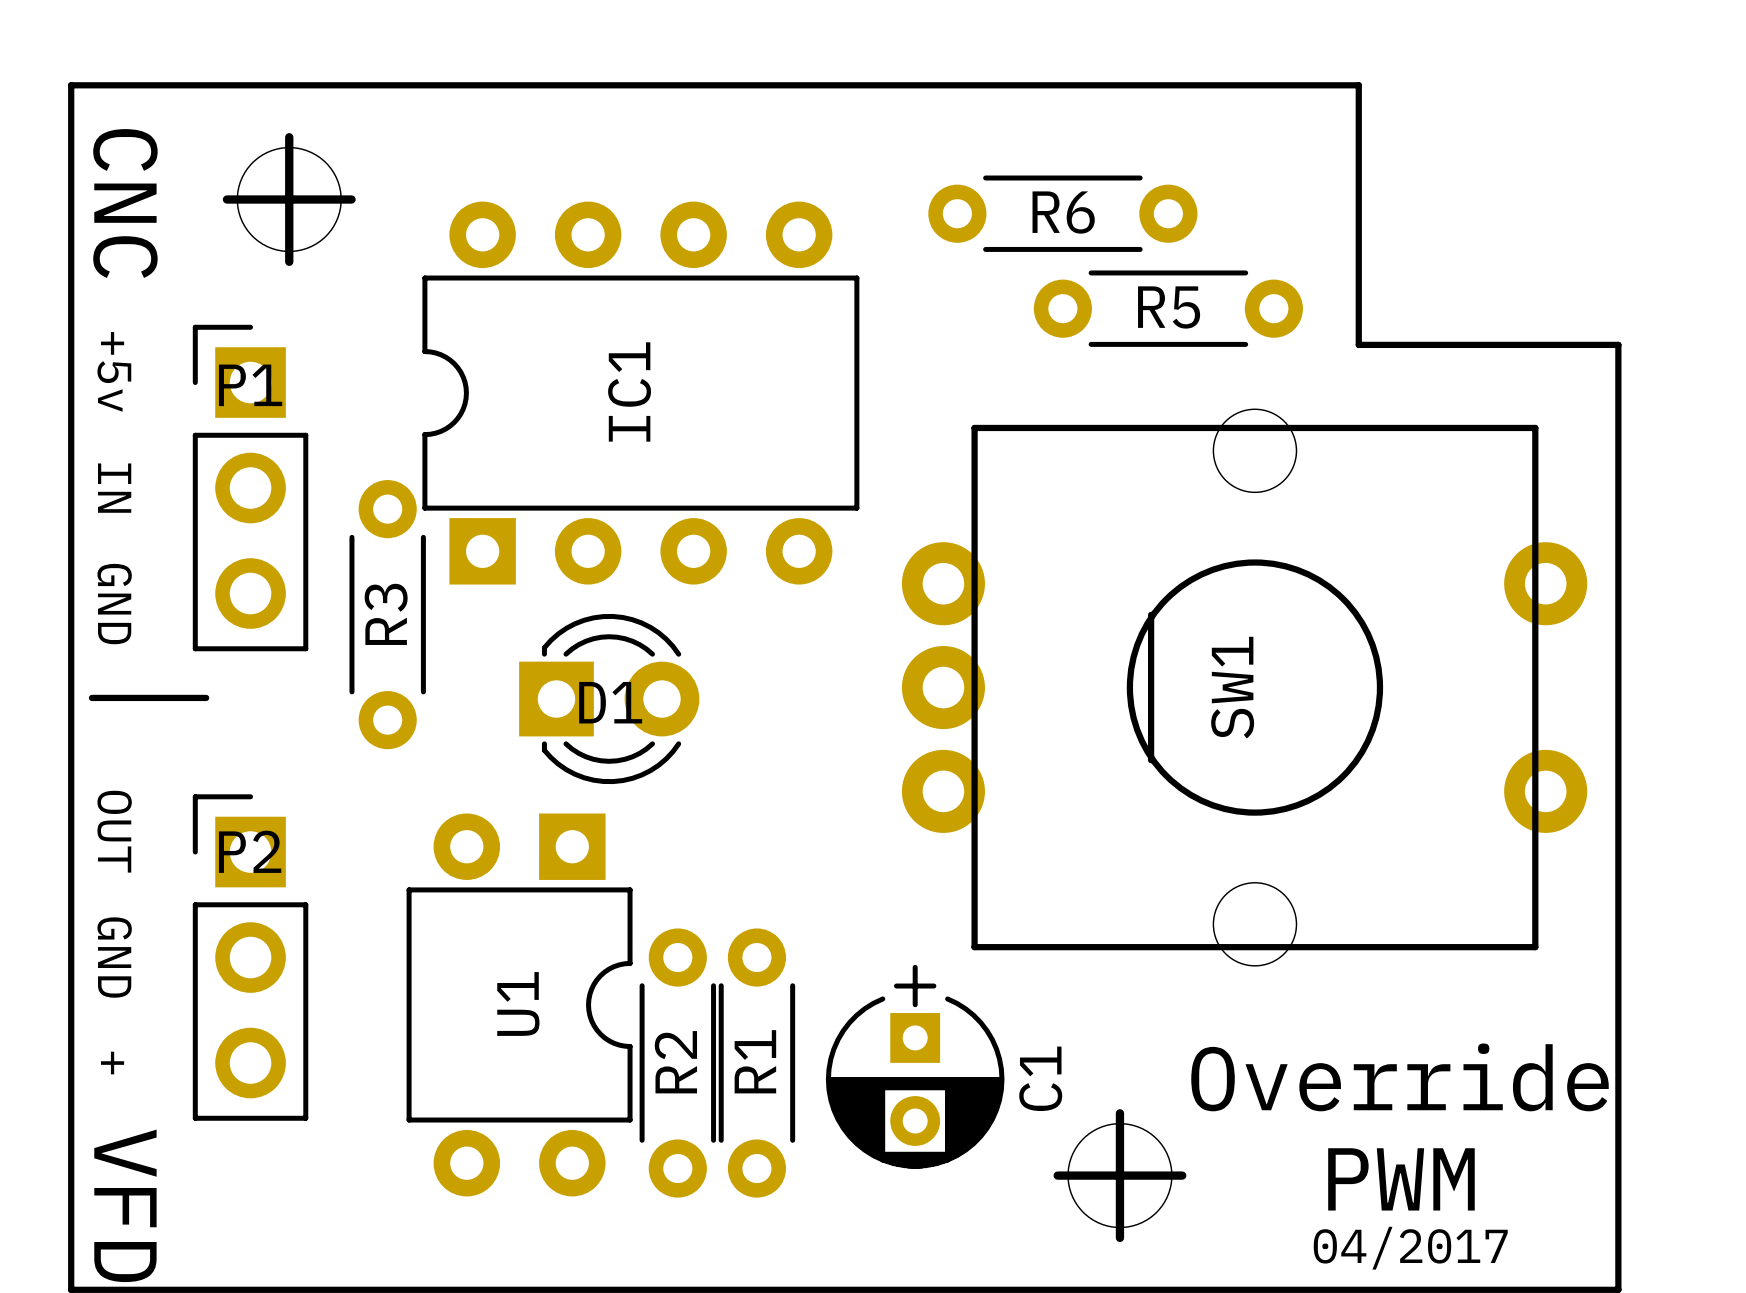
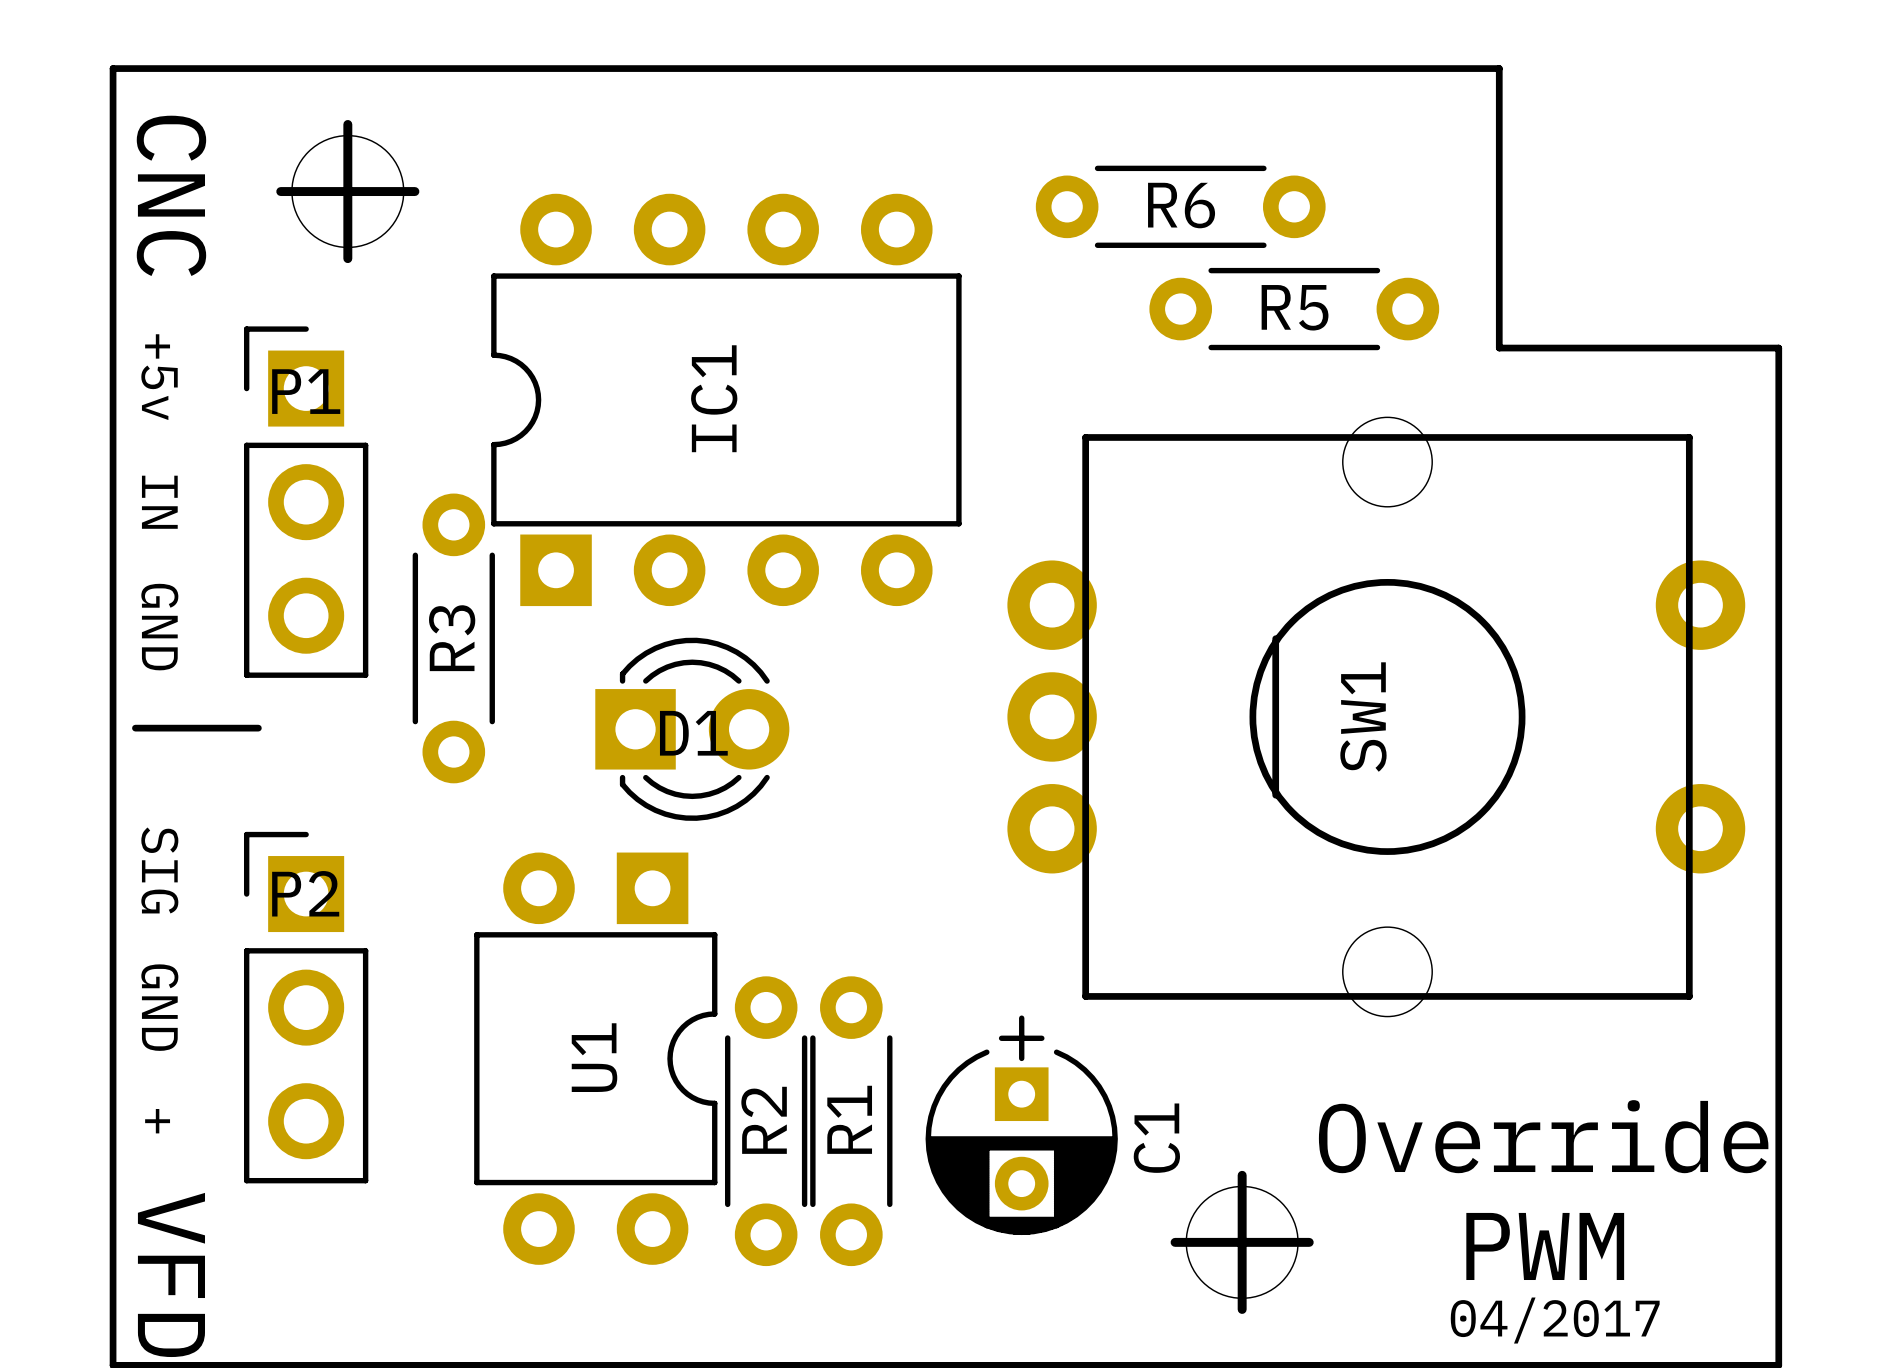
text: OUT (114, 831) -> SIG (159, 870)

